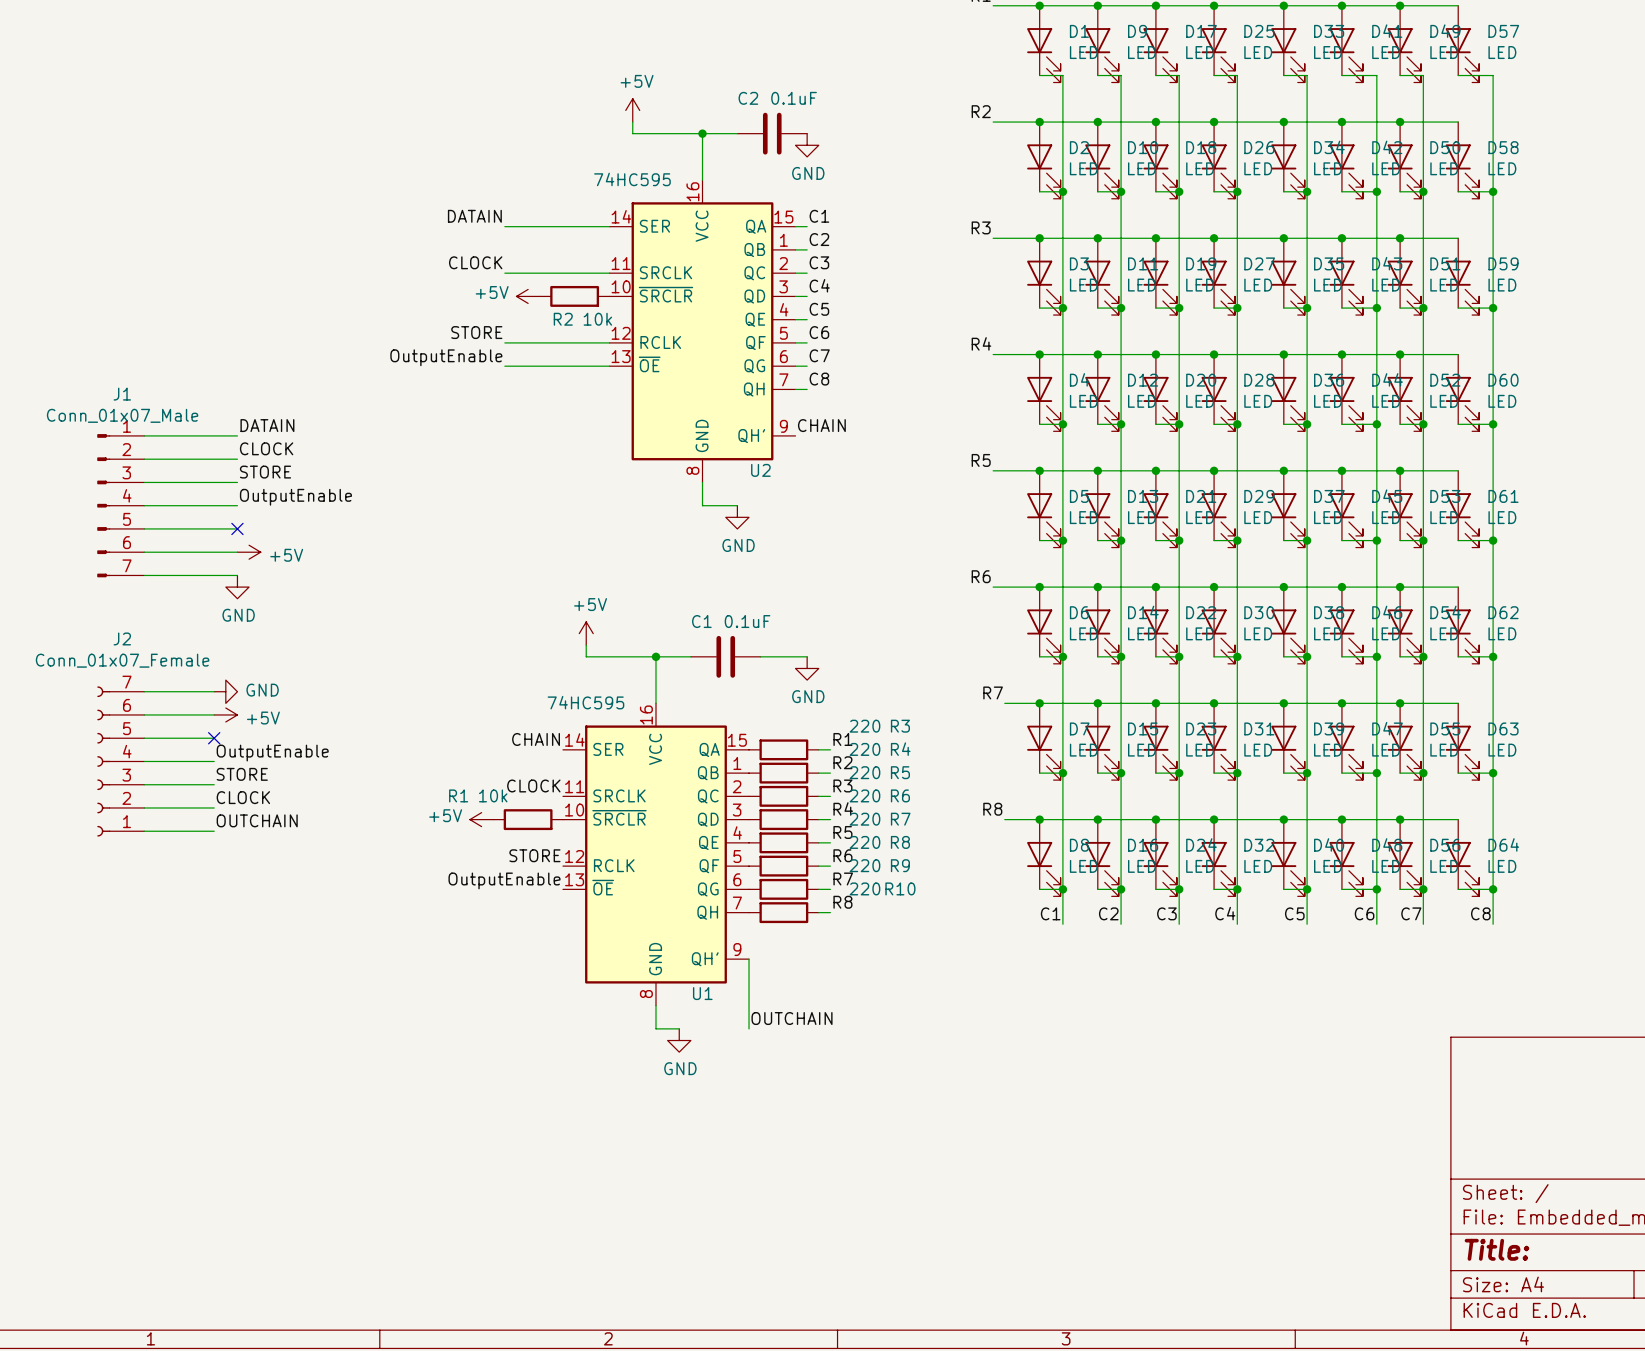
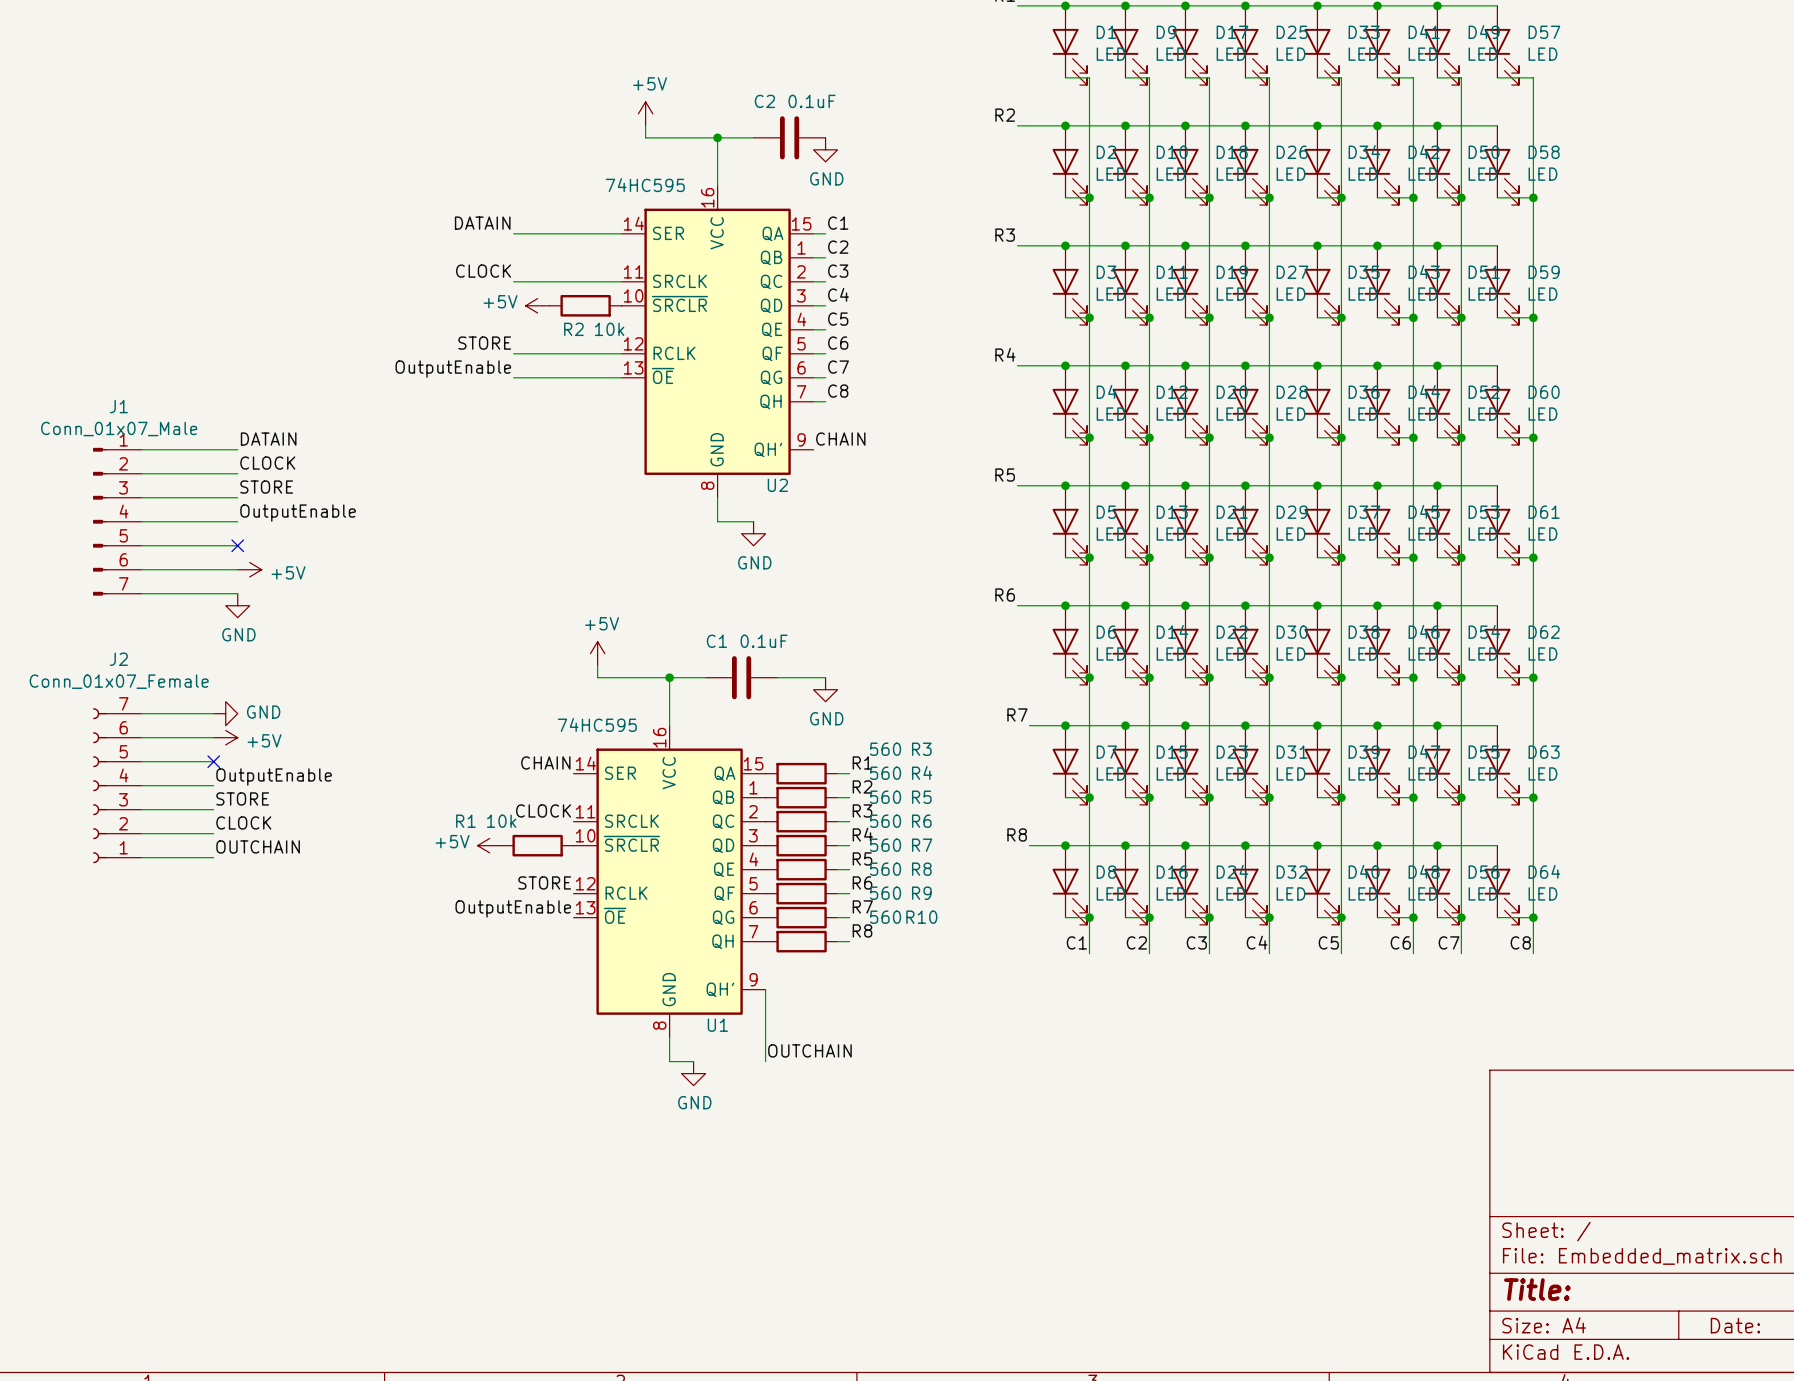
R3 value: 220 (864, 726) -> 560 (885, 749)
R4 value: 220 (864, 749) -> 560 (885, 773)
R5 value: 220 (864, 772) -> 560 (885, 797)
R6 value: 220 (864, 795) -> 560 (885, 821)
R7 value: 220 (864, 819) -> 560 (885, 845)
R8 value: 220 (864, 842) -> 560 (885, 869)
R9 value: 220 (864, 865) -> 560 (885, 893)
R10 value: 220 (864, 888) -> 560 (885, 917)

